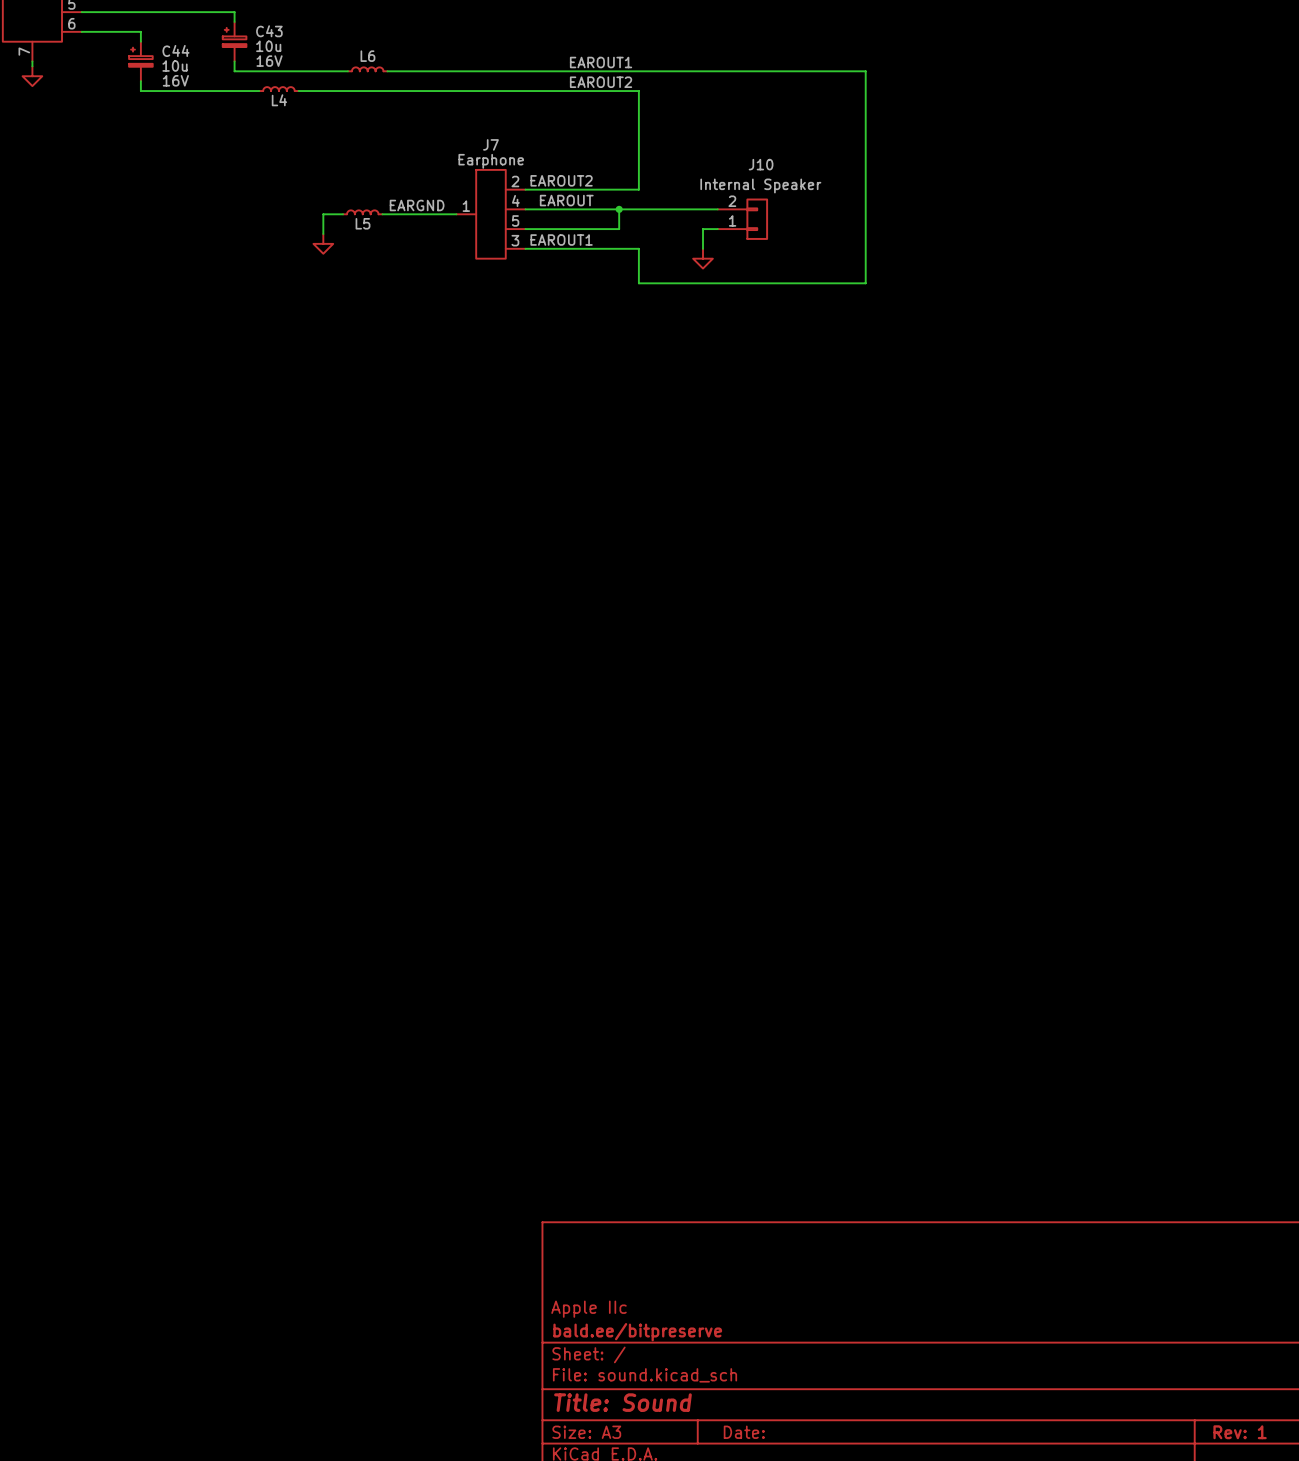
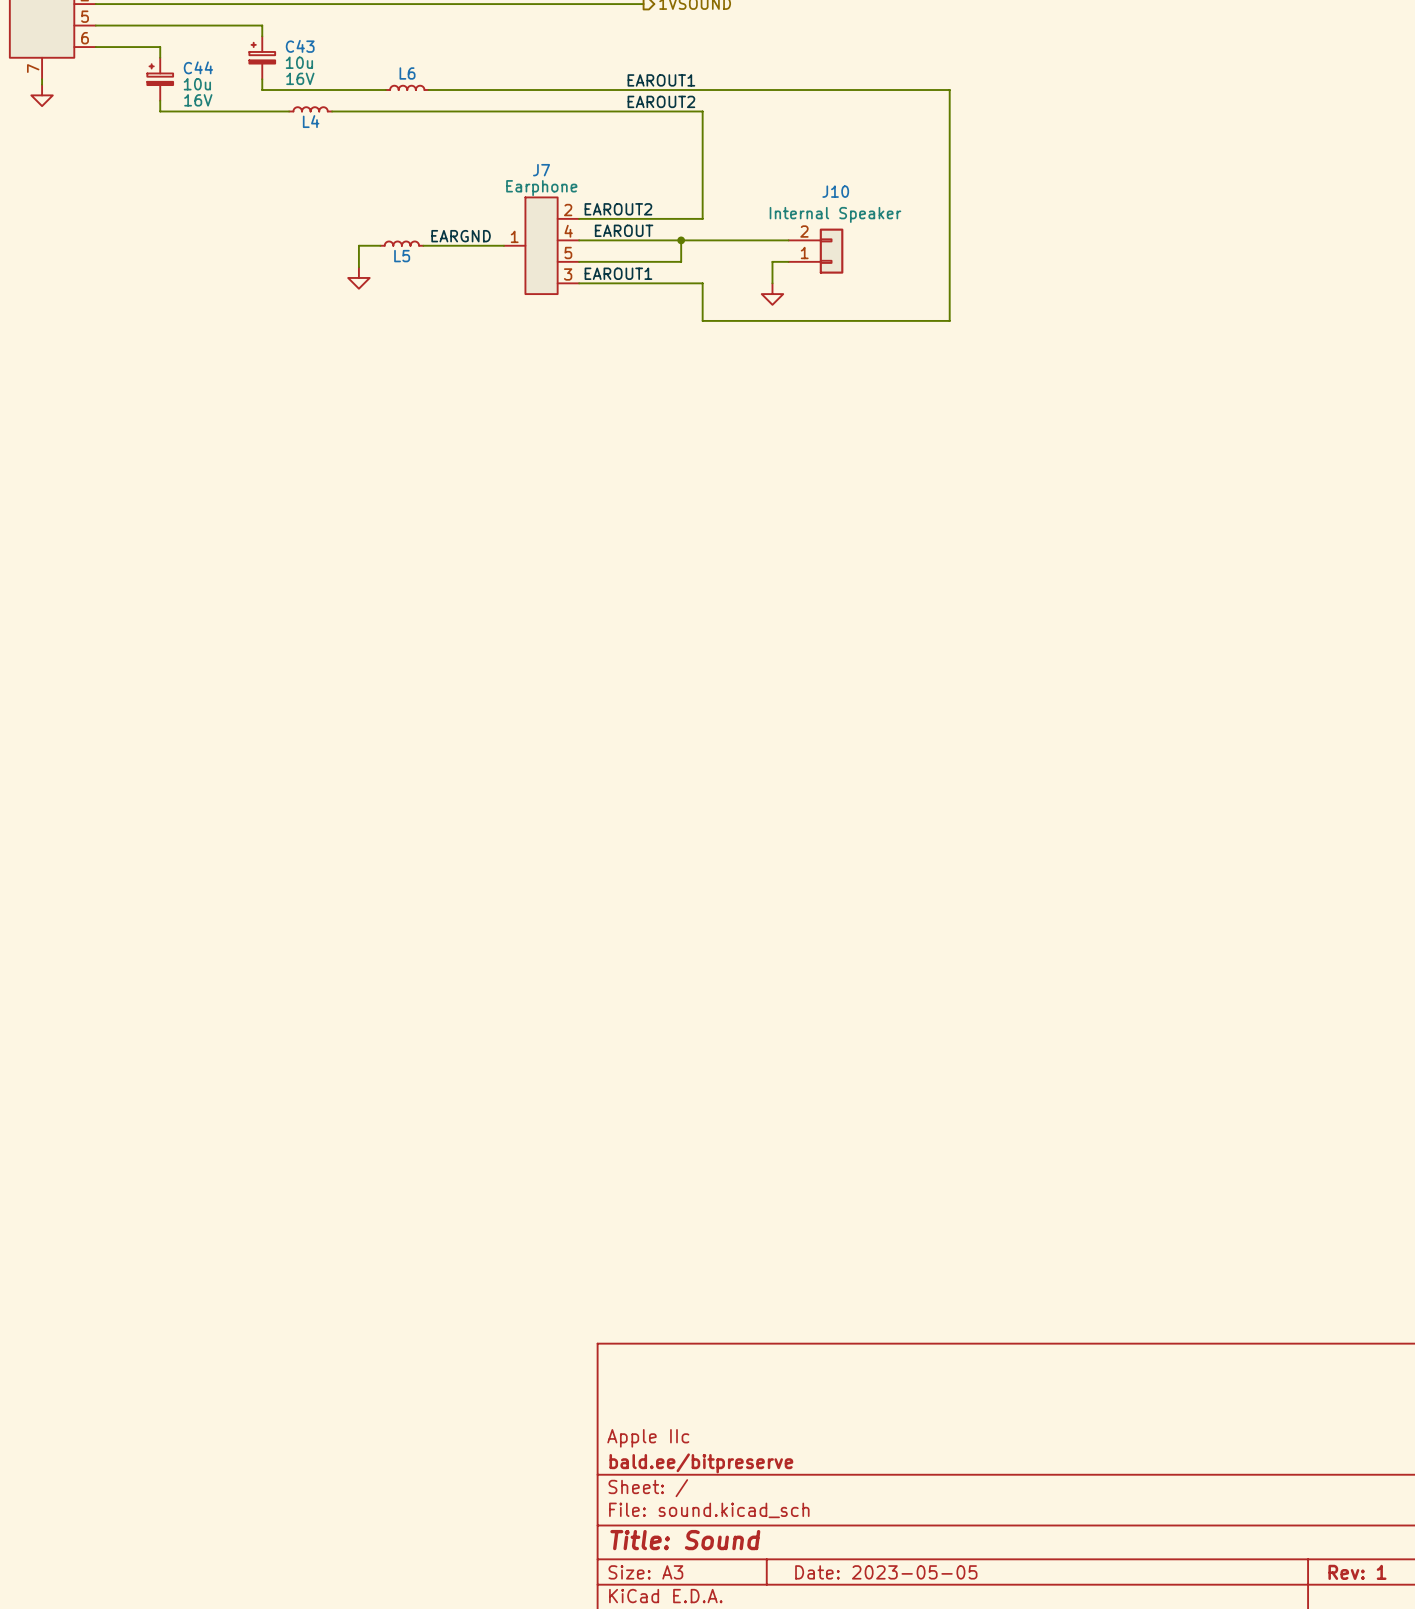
title block: Date: (744, 1432) -> Date: 2023-05-05 (886, 1572)

